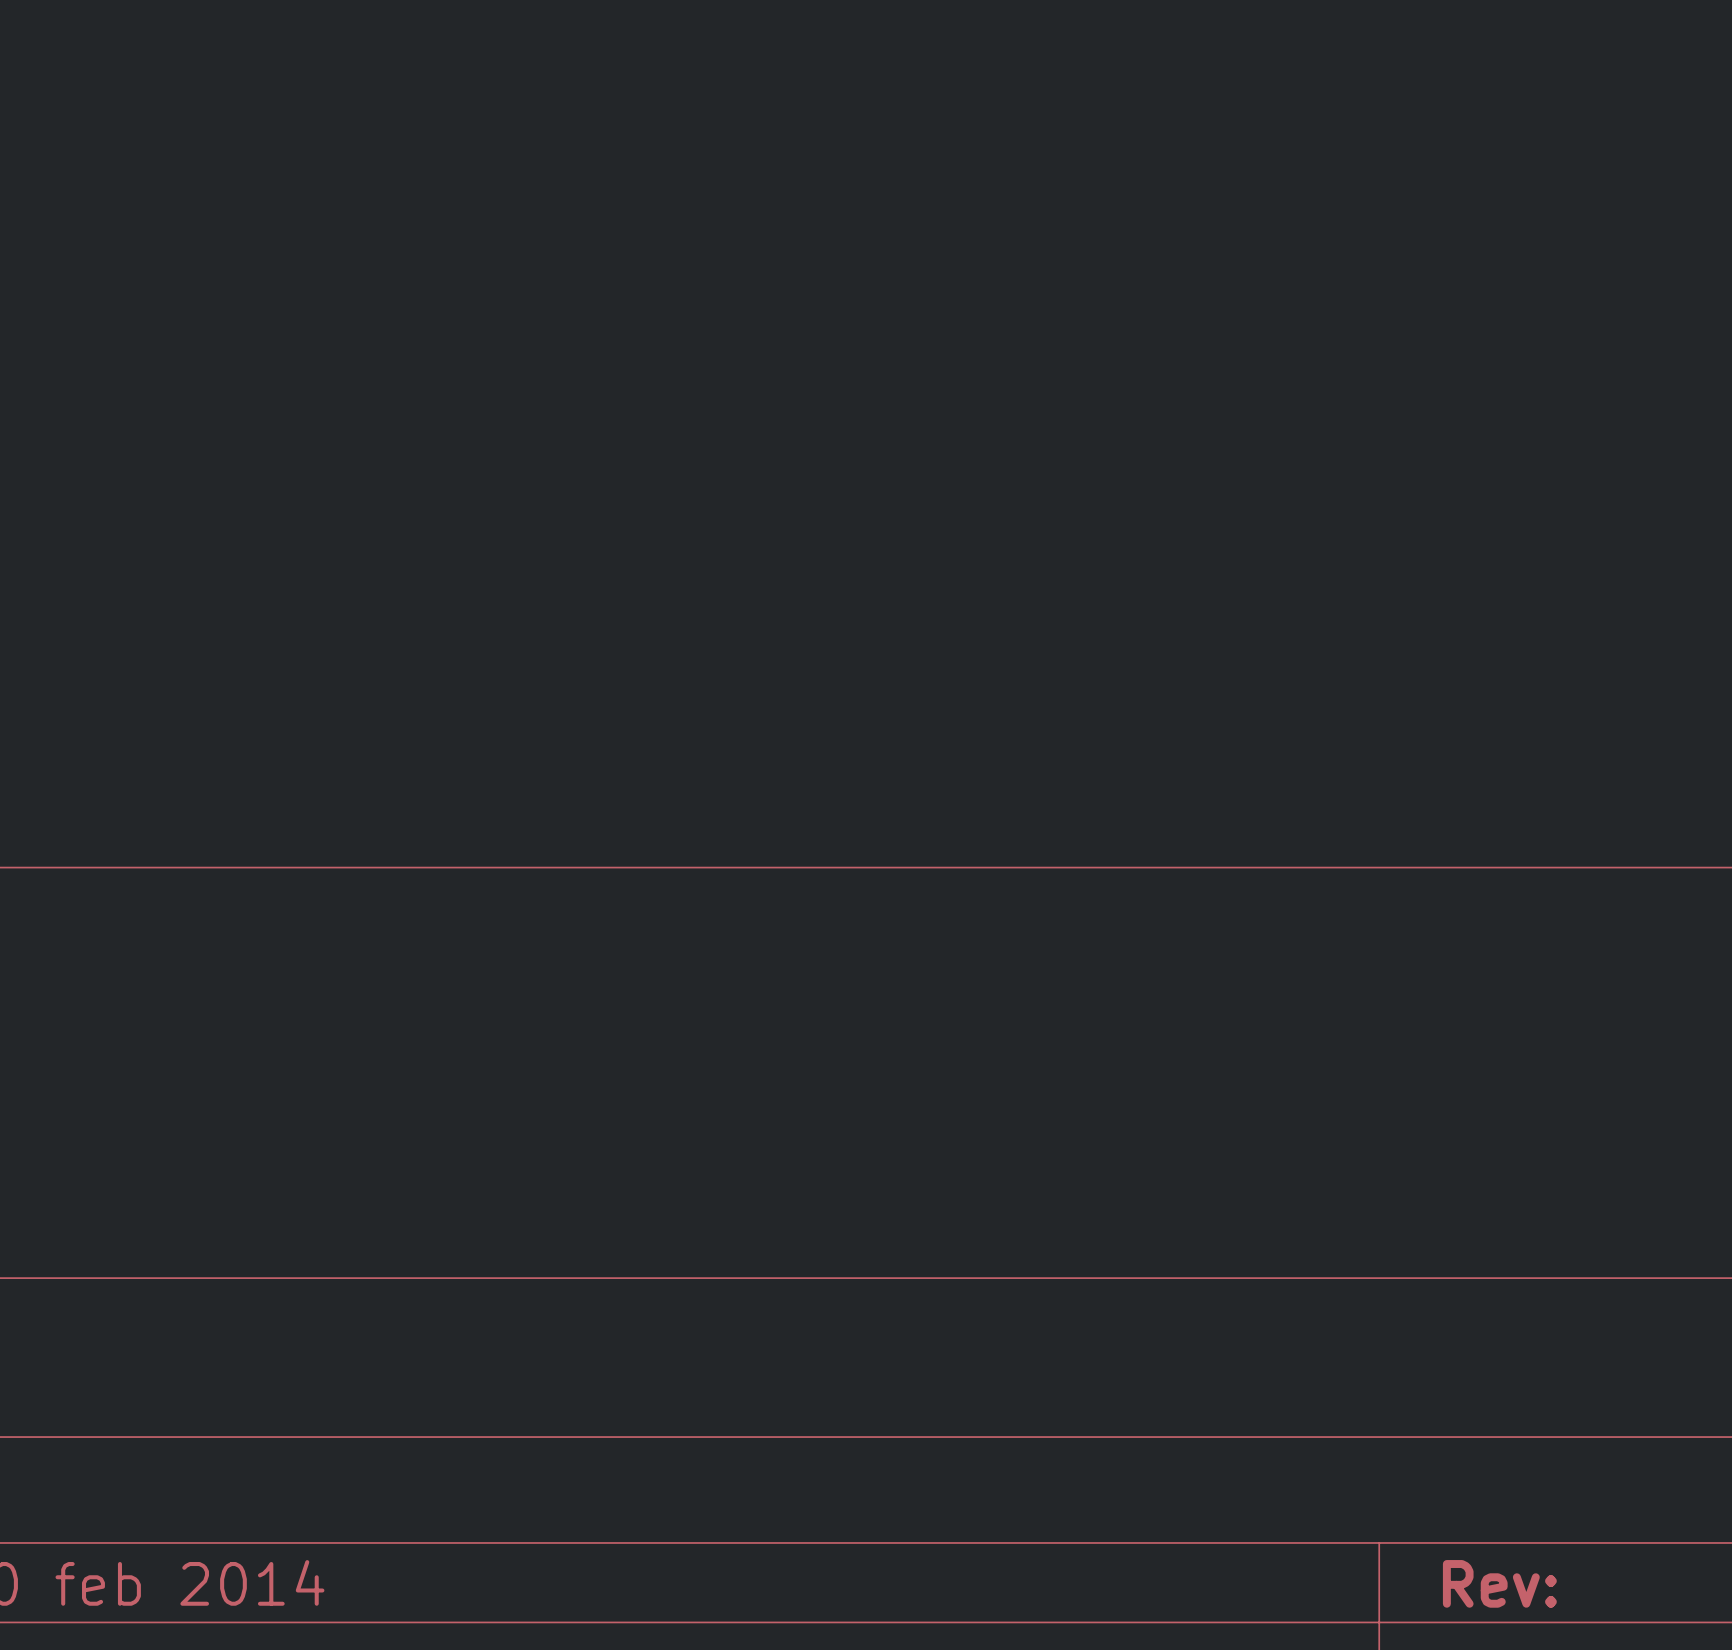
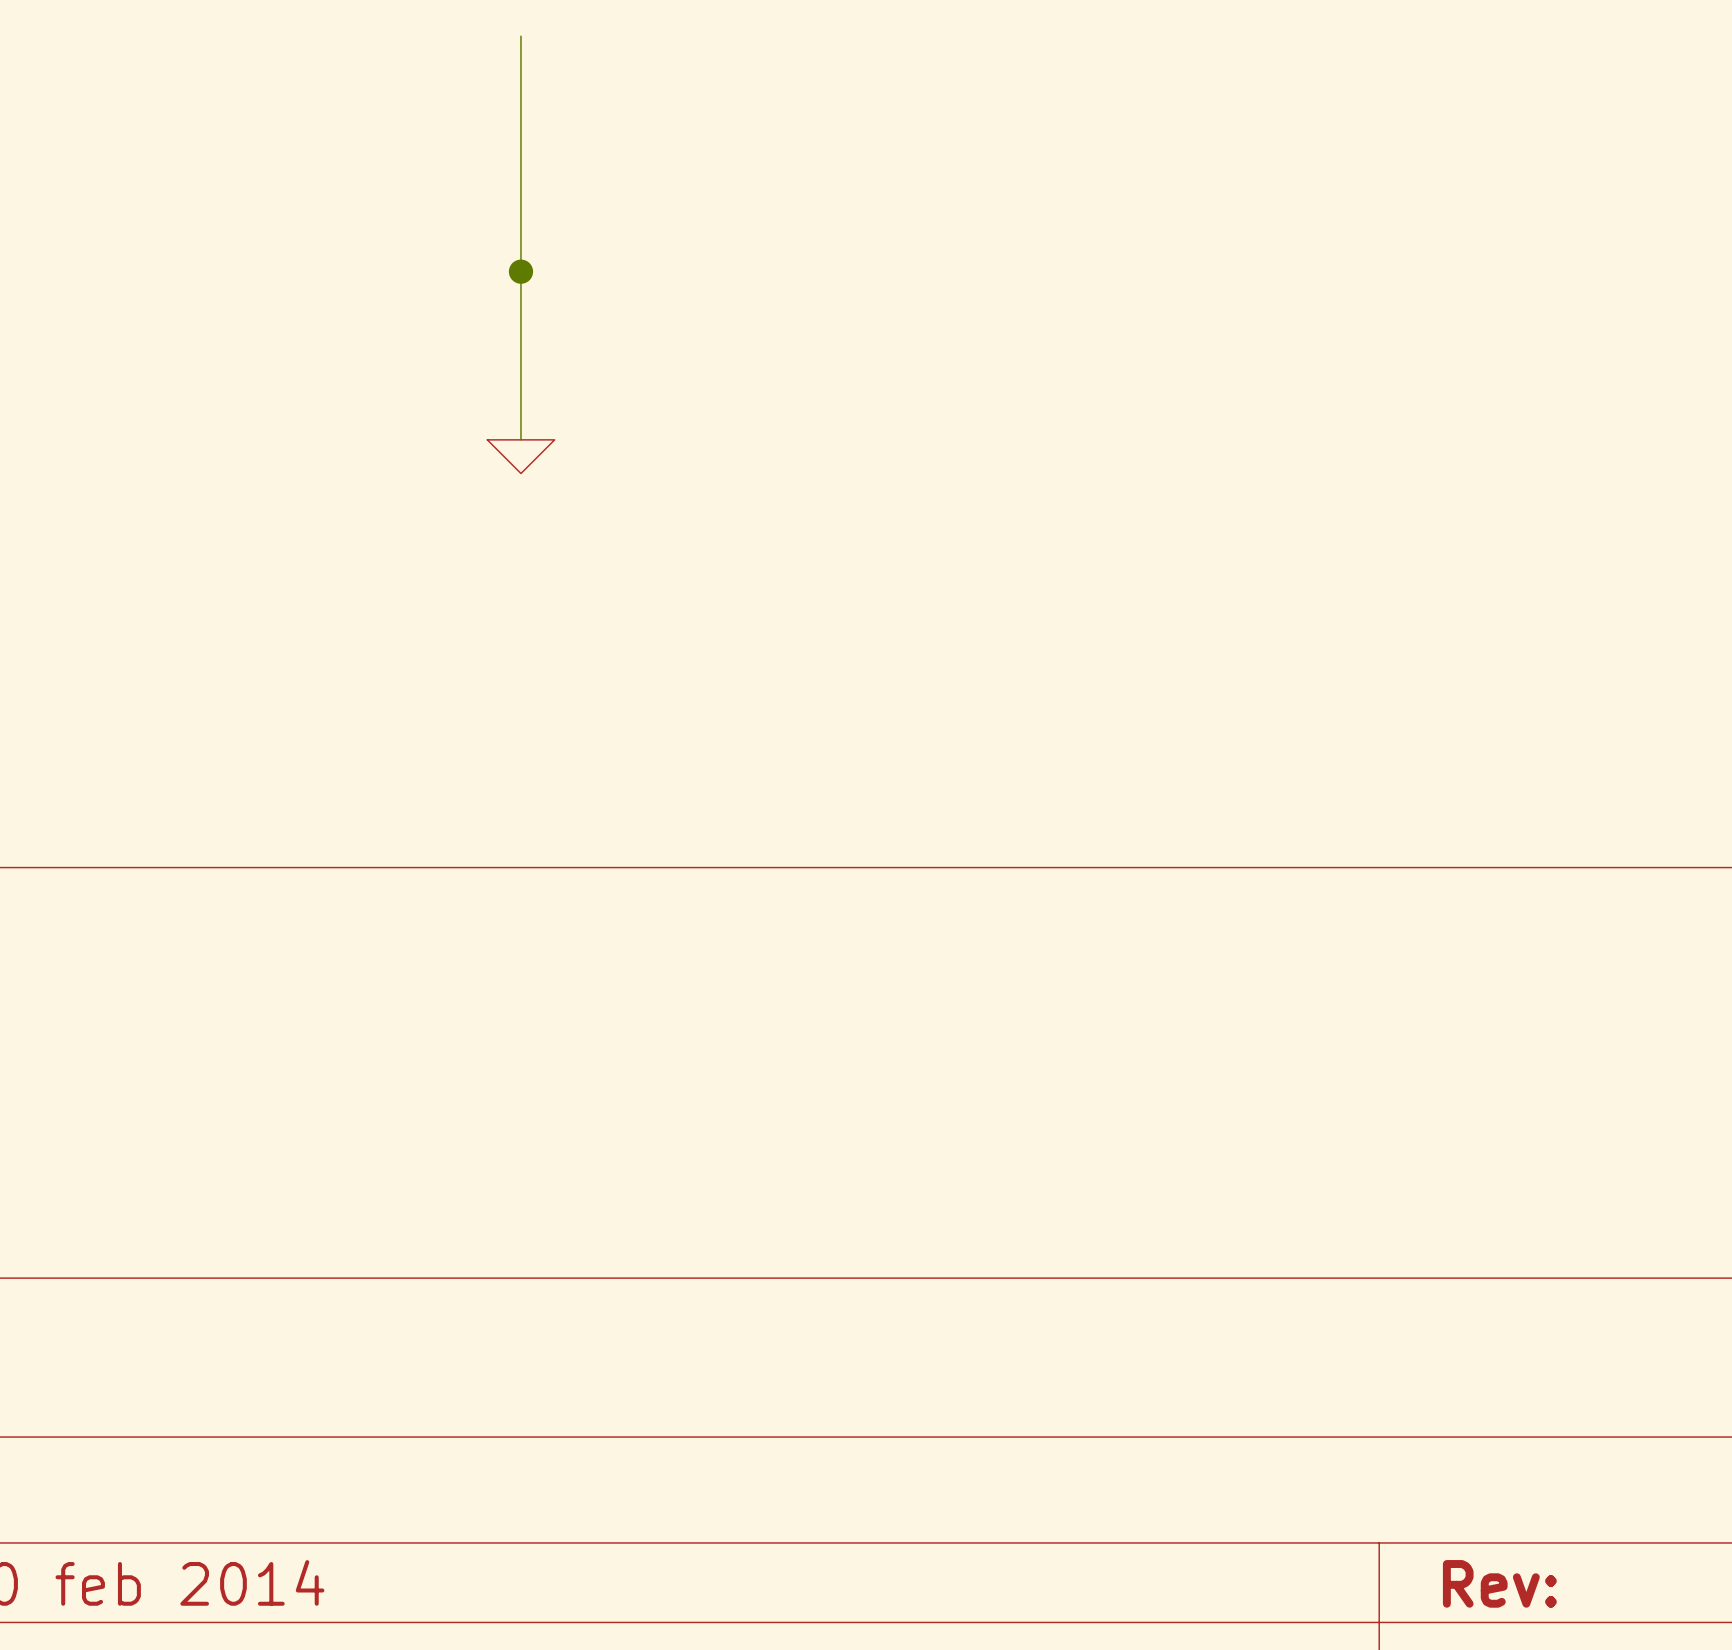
wire: none -> (520, 36) (520, 439)
junction: none -> (520, 271)
power symbol: none -> (520, 456)

